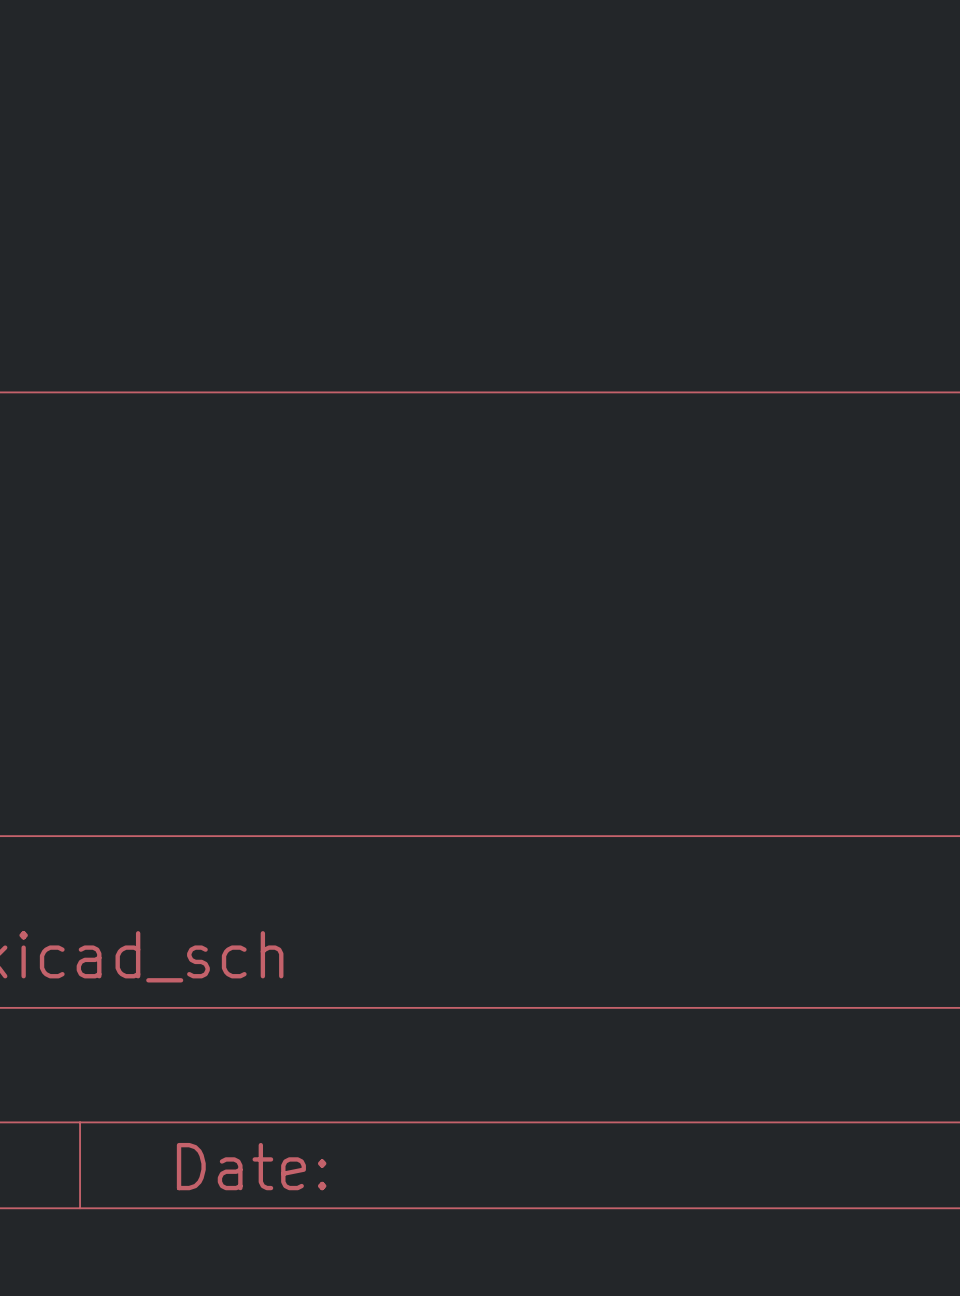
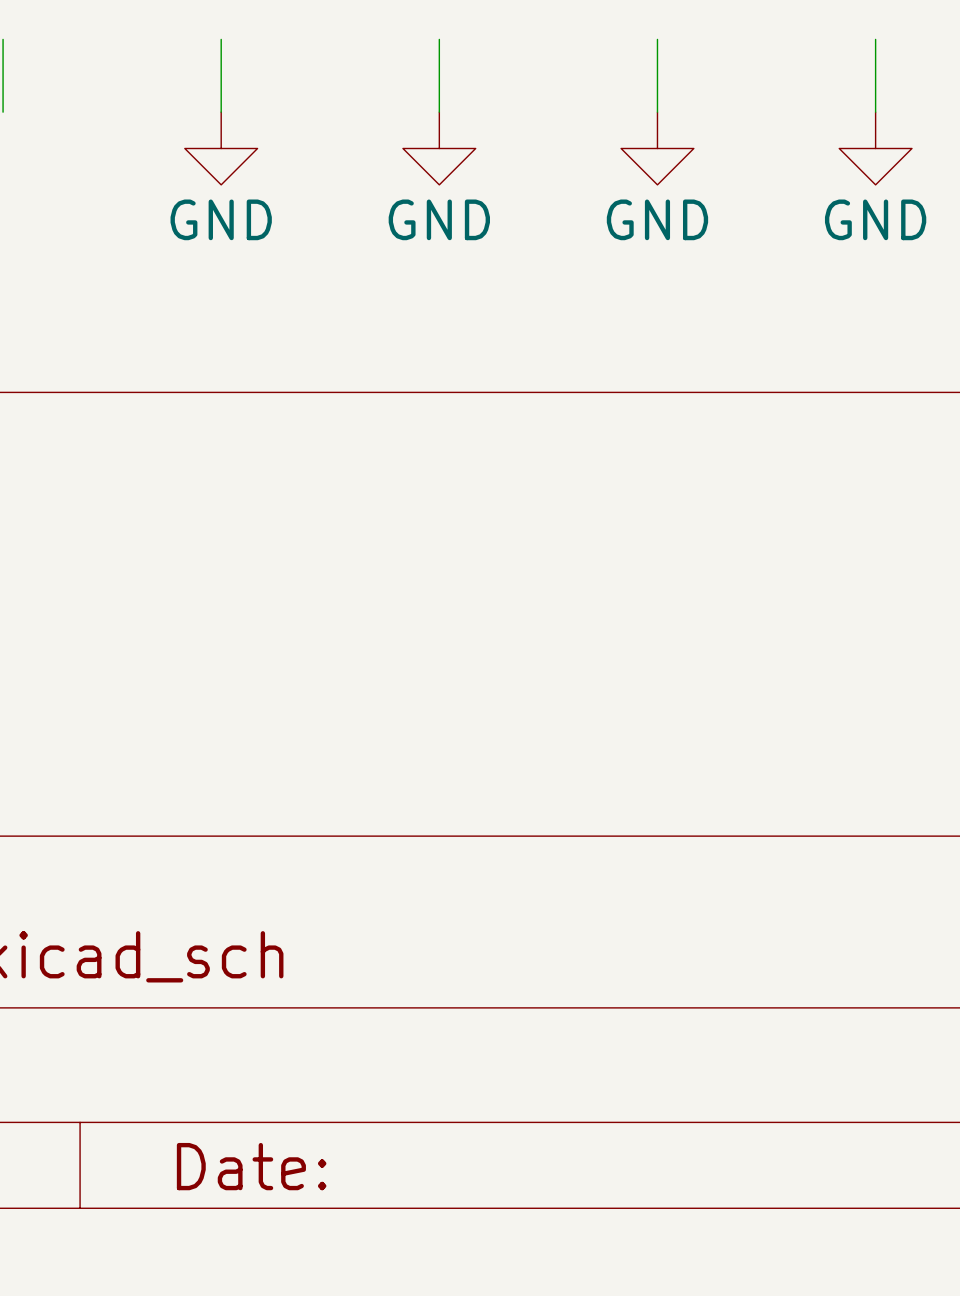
wire: none -> (3, 39) (3, 112)
wire: none -> (221, 39) (221, 112)
wire: none -> (439, 39) (439, 112)
wire: none -> (657, 39) (657, 112)
wire: none -> (875, 39) (875, 112)
power symbol: none -> GND (221, 148)
power symbol: none -> GND (439, 148)
power symbol: none -> GND (657, 148)
power symbol: none -> GND (875, 148)

